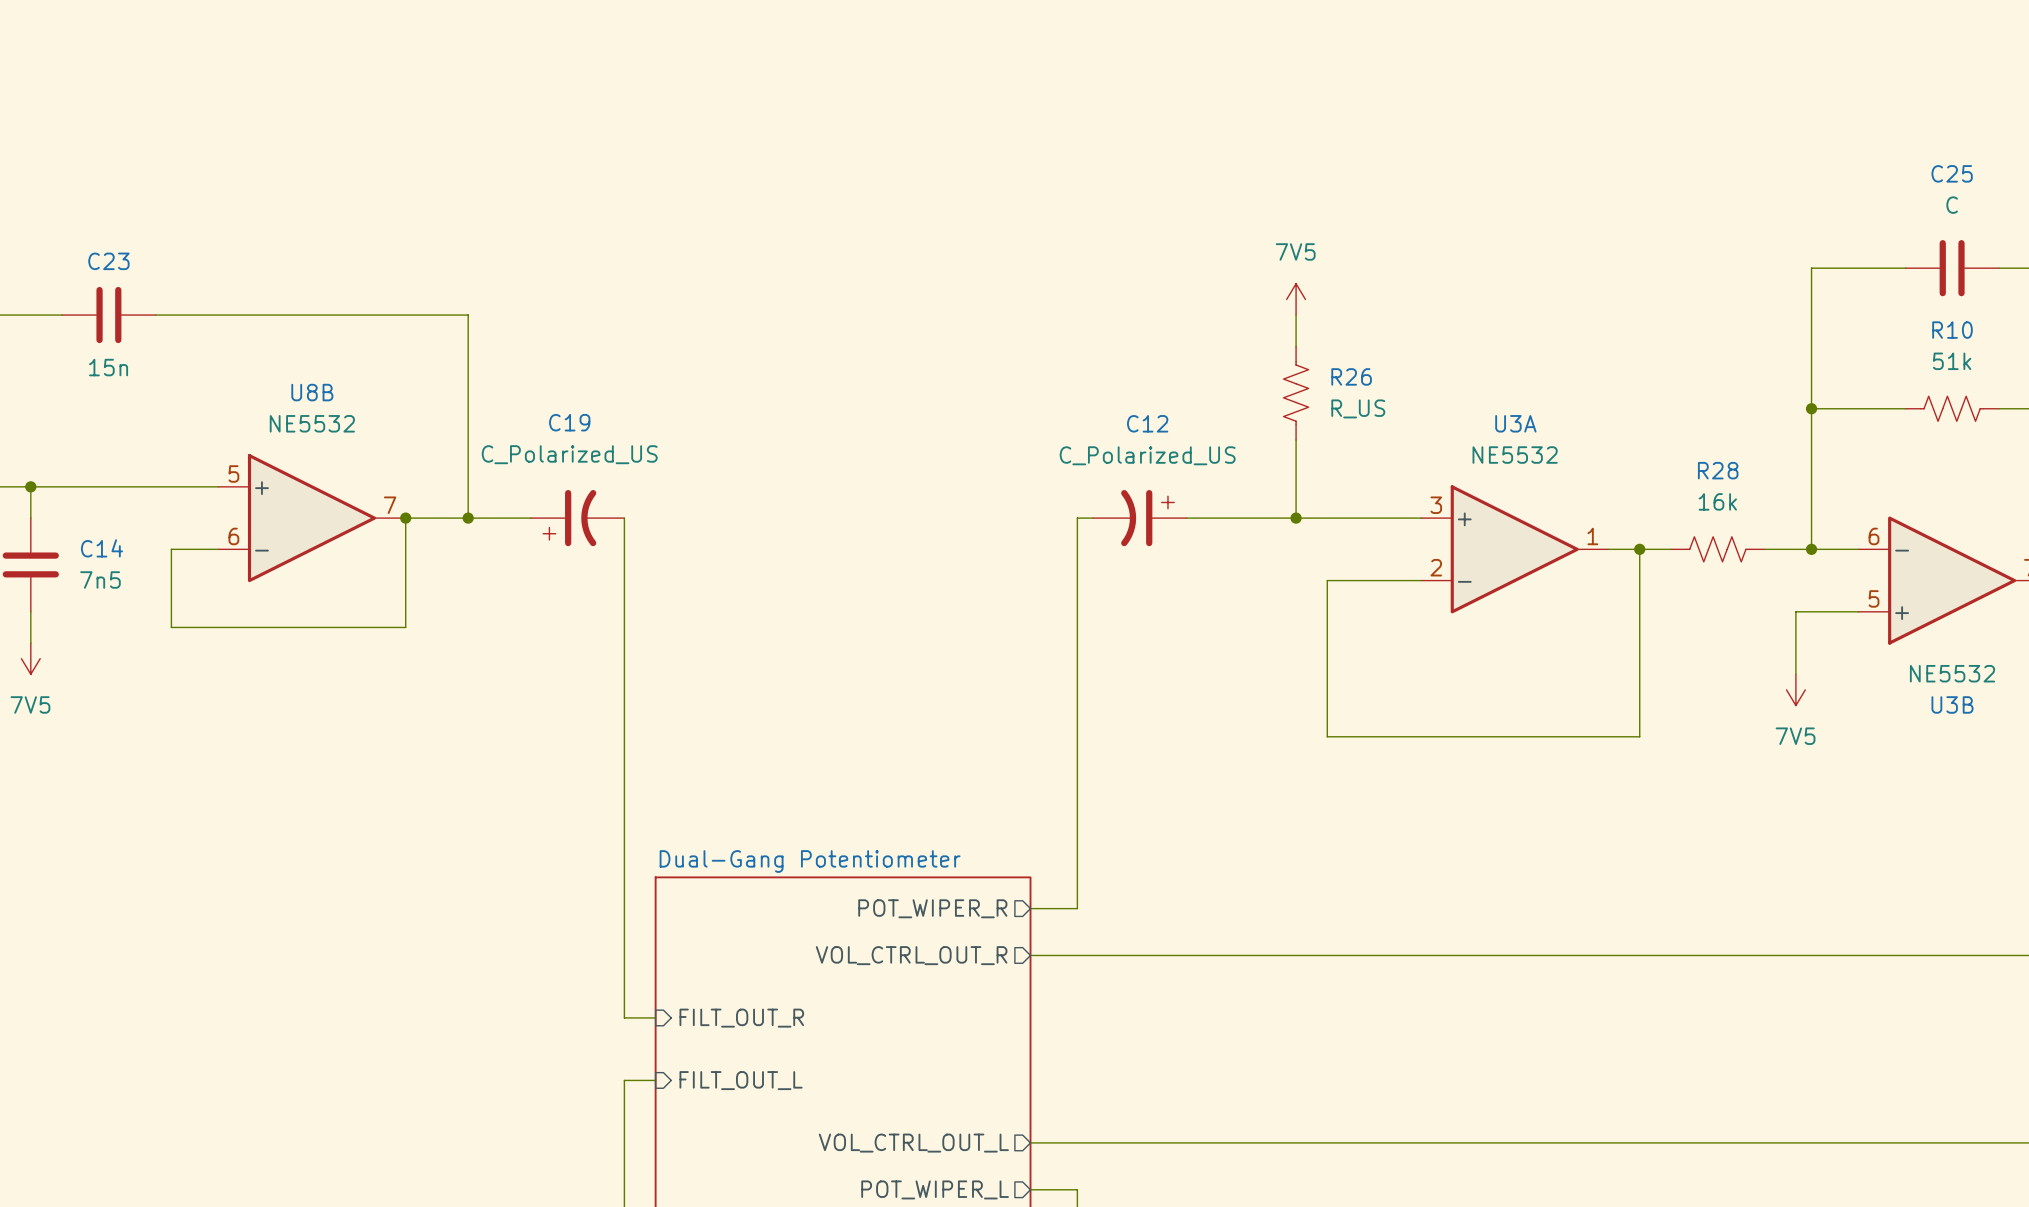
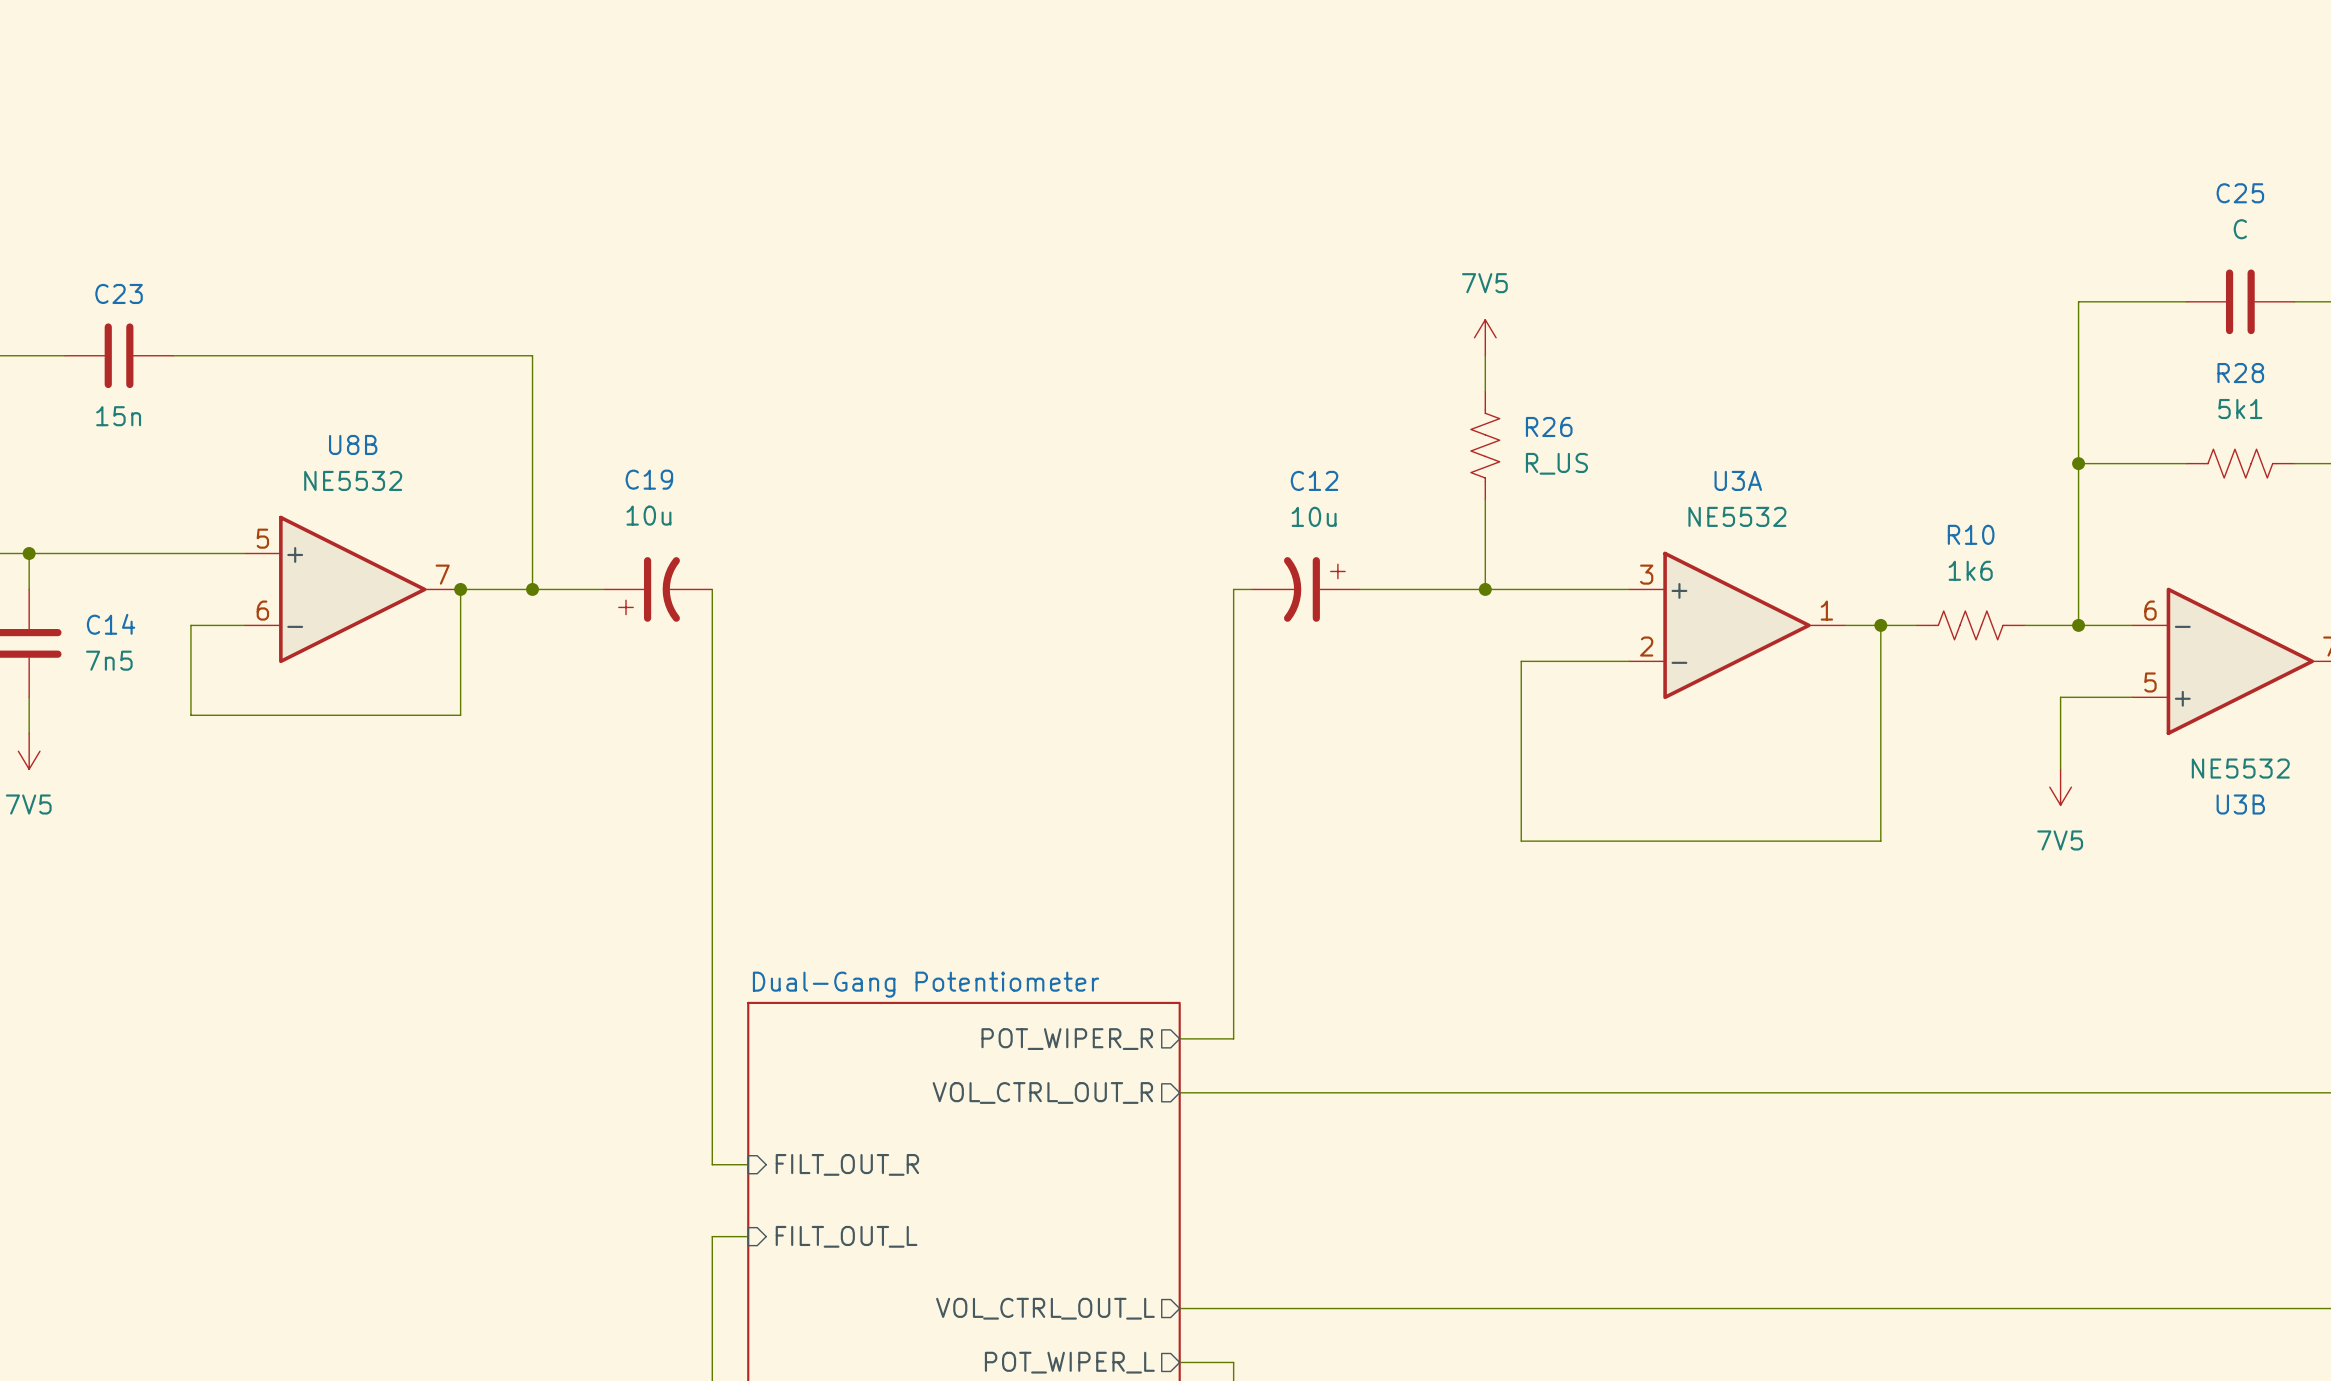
R10 name: R10 (1952, 330) -> R28 (2240, 373)
R10 value: 51k (1952, 361) -> 5k1 (2240, 409)
C19 value: C_Polarized_US (569, 454) -> 10u (648, 515)
C12 value: C_Polarized_US (1147, 455) -> 10u (1314, 516)
R28 name: R28 (1718, 470) -> R10 (1971, 534)
R28 value: 16k (1717, 501) -> 1k6 (1970, 570)

